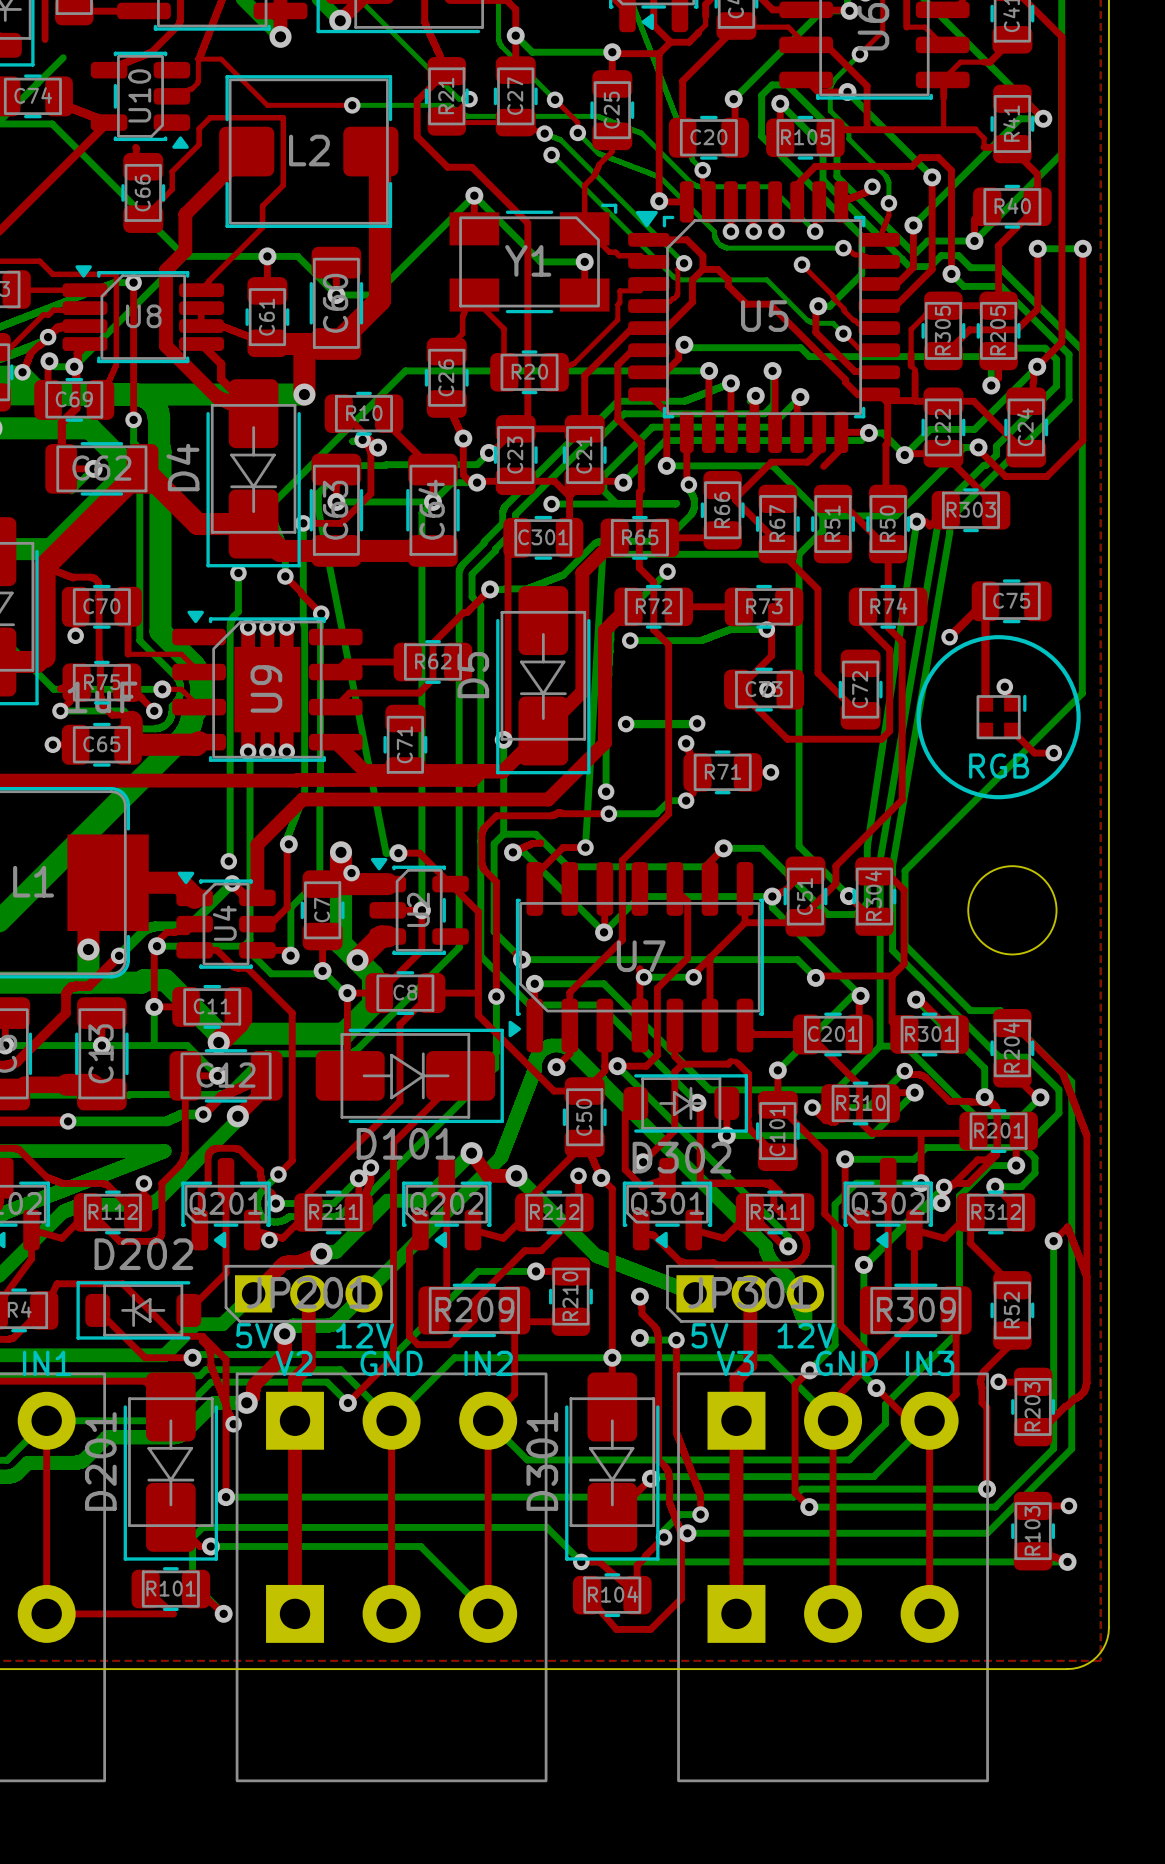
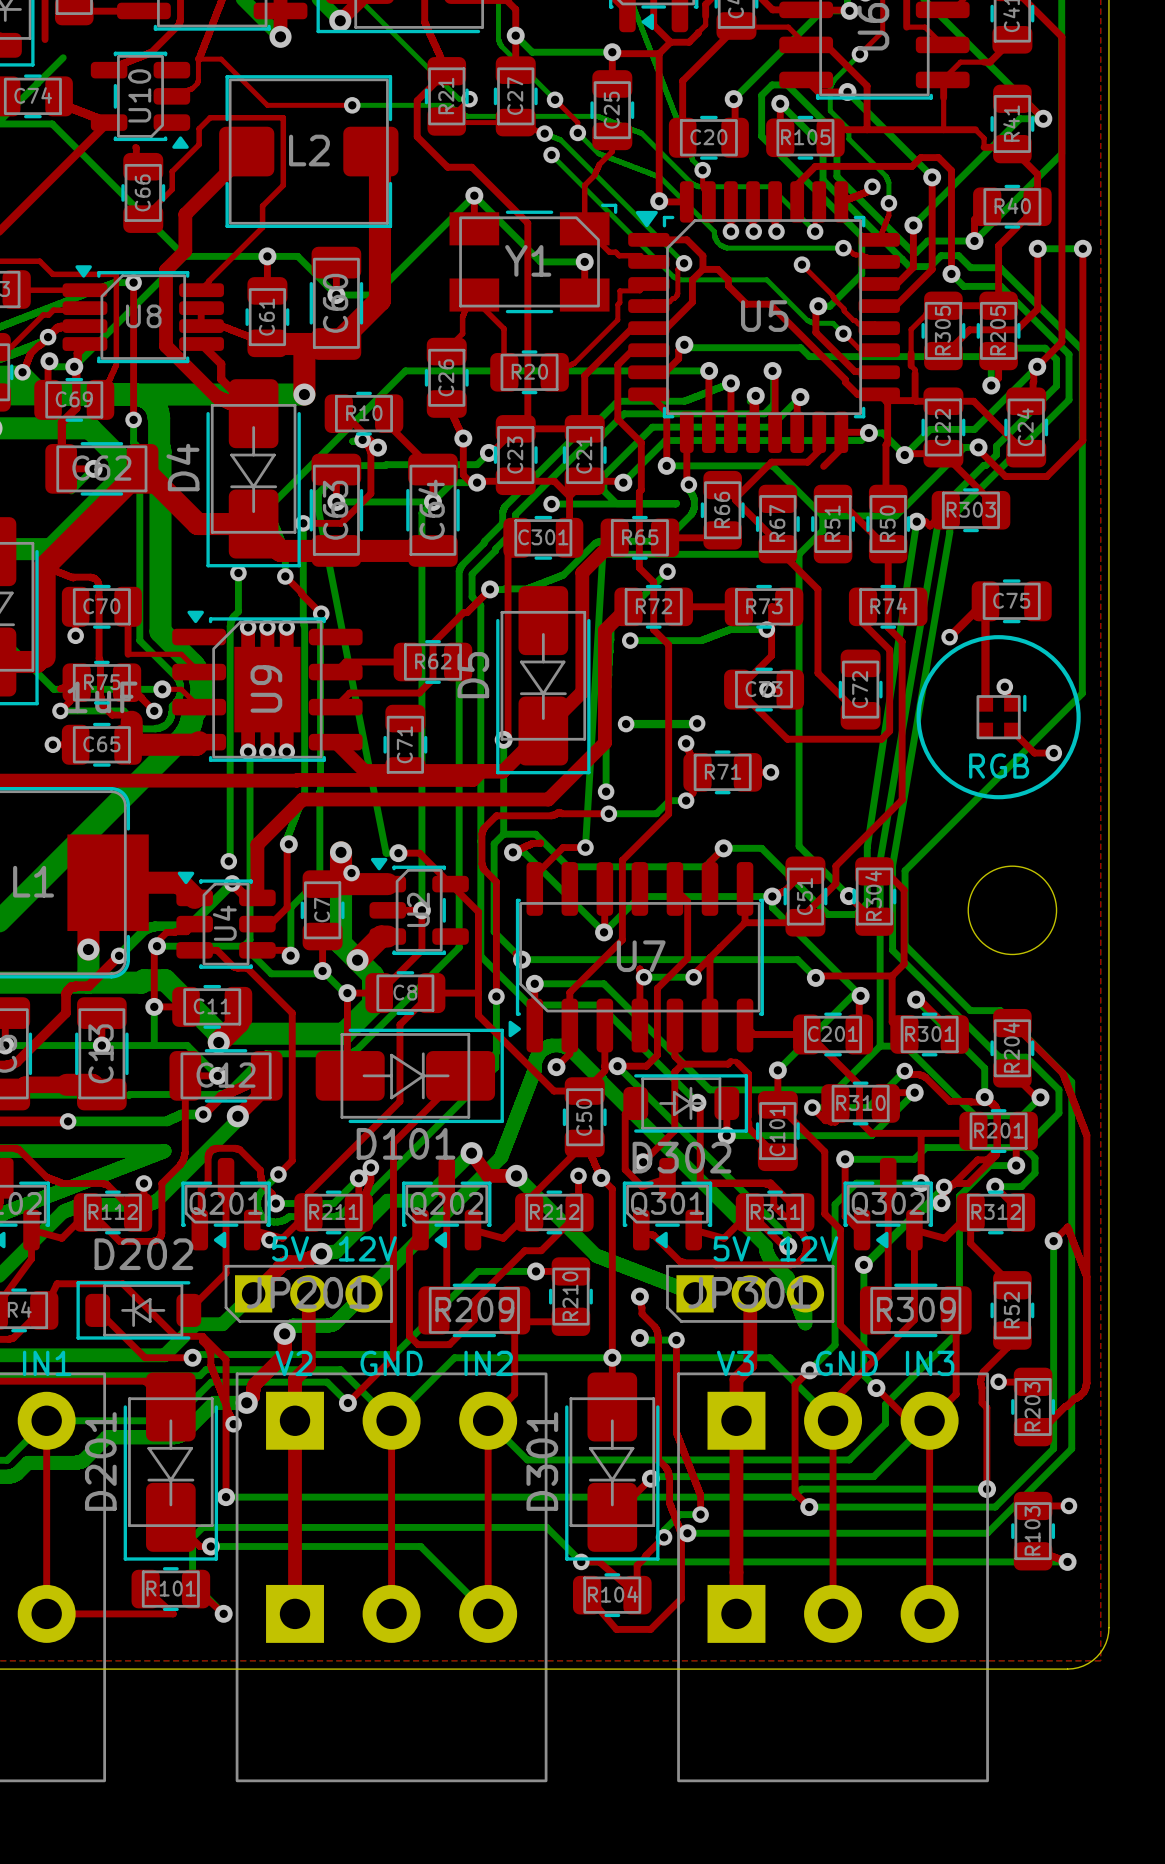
text position: 5V (254, 1335) -> 5V (290, 1248)
text position: 12V (365, 1335) -> 12V (367, 1248)
text position: 5V (709, 1335) -> 5V (732, 1248)
text position: 12V (806, 1335) -> 12V (809, 1248)

